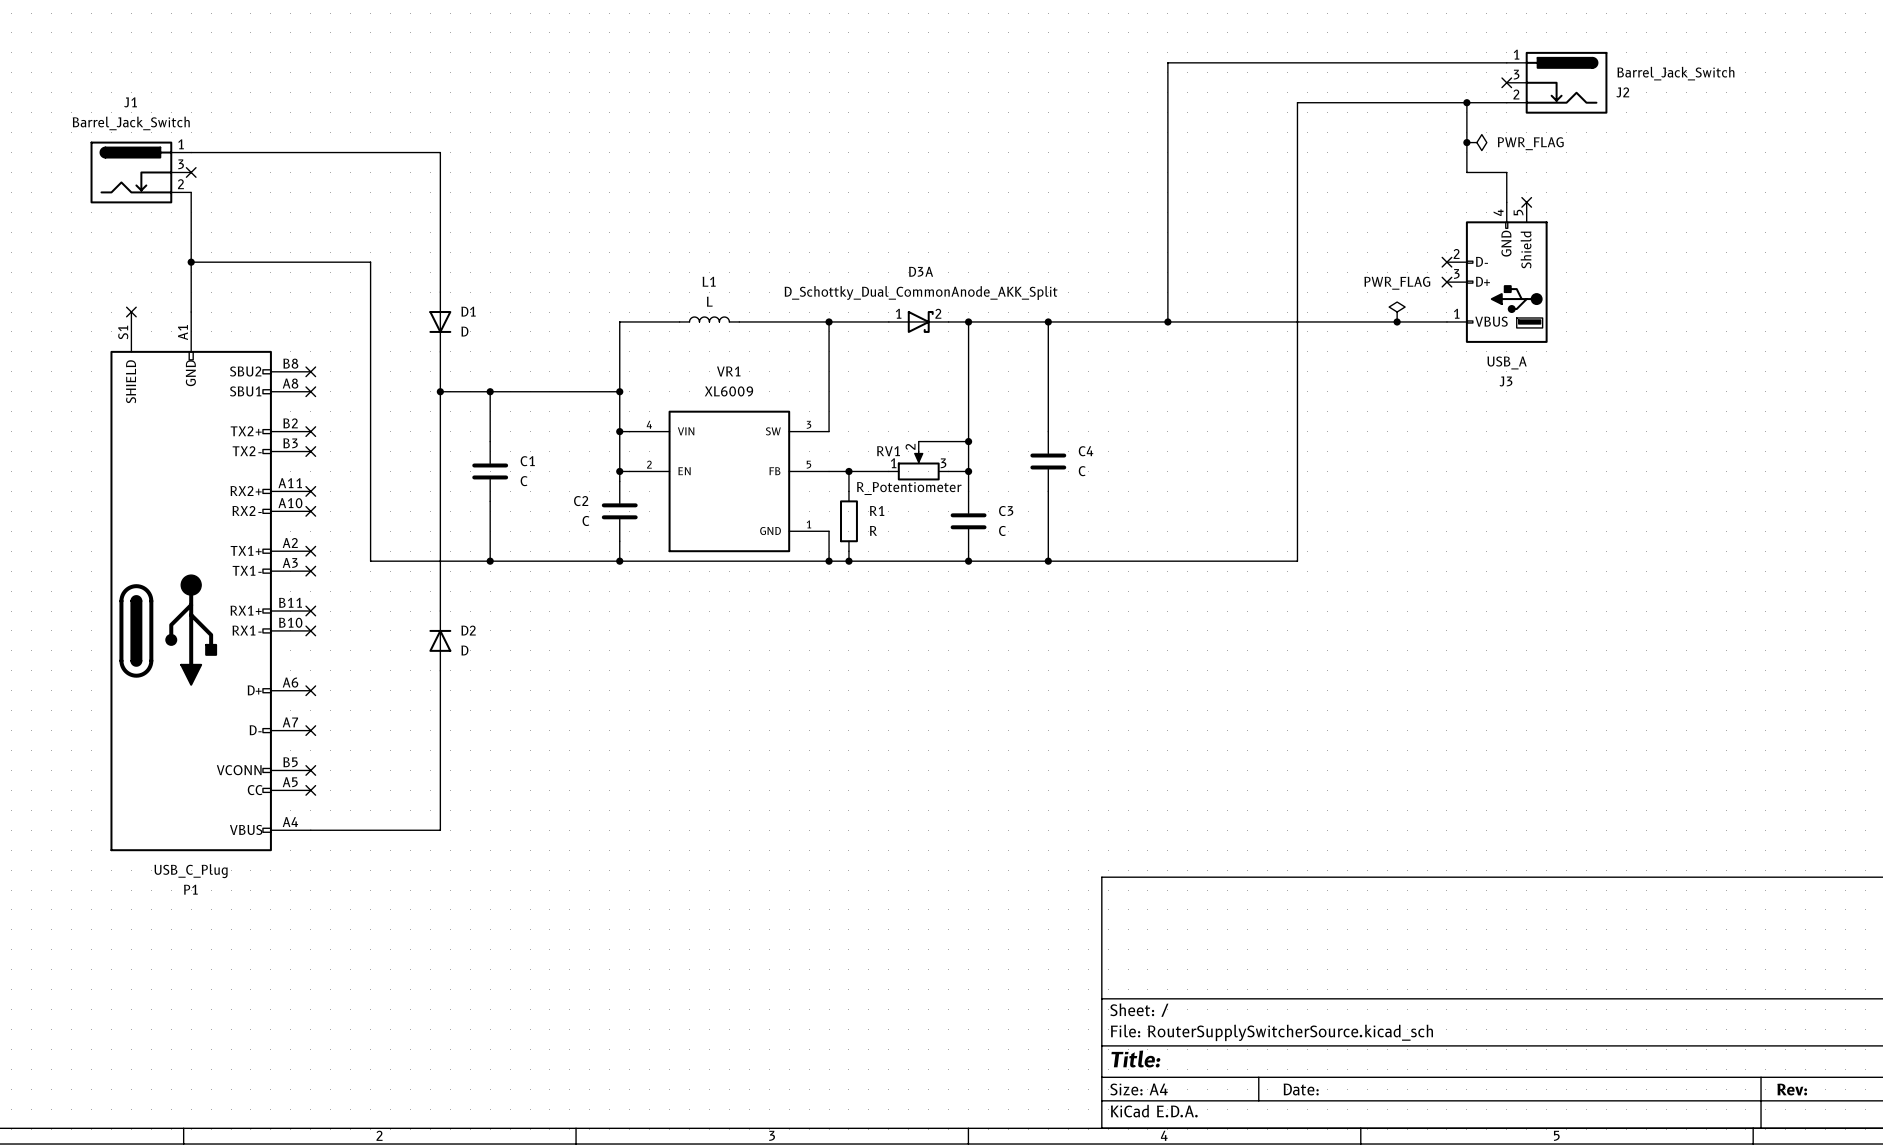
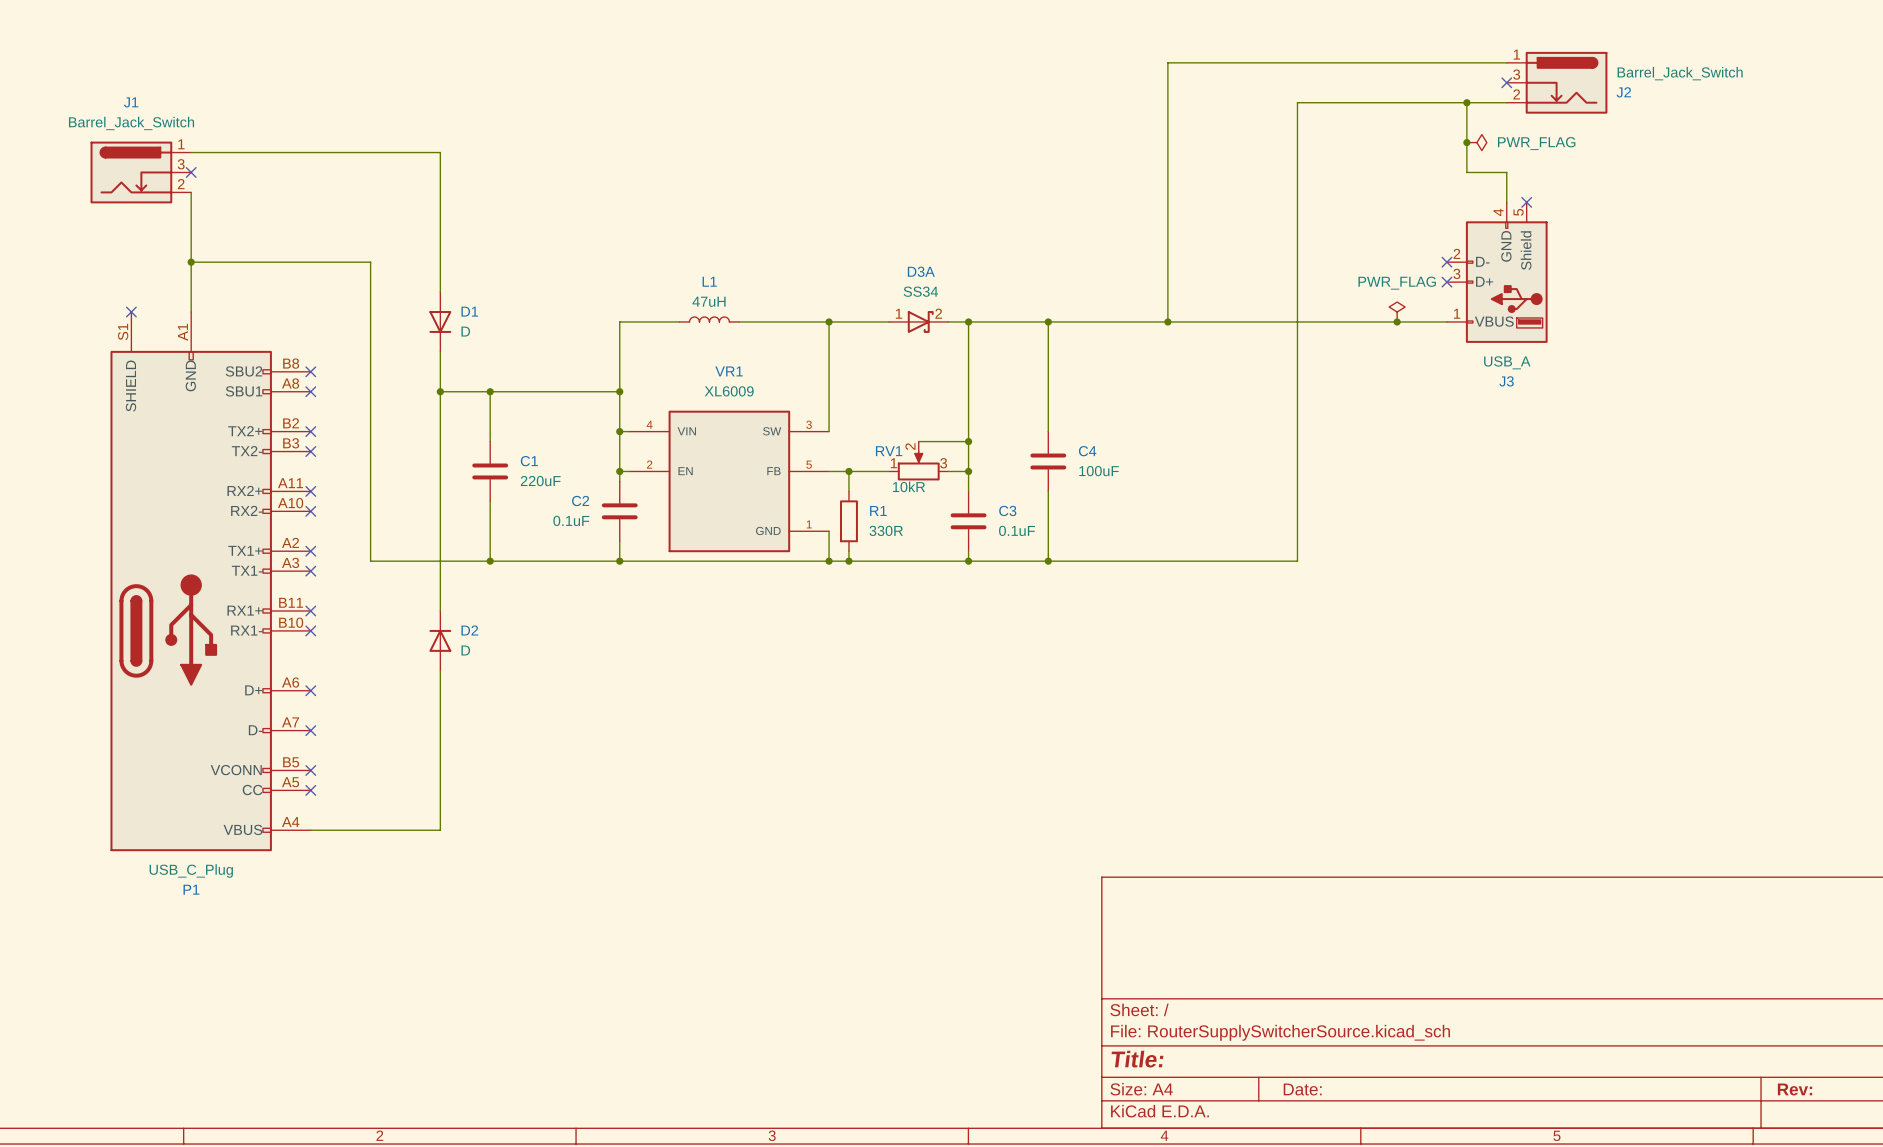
D3A value: D_Schottky_Dual_CommonAnode_AKK_Split (921, 293) -> SS34 (920, 291)
L1 value: L (709, 301) -> 47uH (709, 301)
C4 value: C (1082, 471) -> 100uF (1099, 471)
C1 value: C (524, 481) -> 220uF (540, 481)
RV1 value: R_Potentiometer (909, 488) -> 10kR (908, 486)
C2 value: C (585, 521) -> 0.1uF (571, 520)
R1 value: R (873, 530) -> 330R (886, 530)
C3 value: C (1002, 530) -> 0.1uF (1016, 530)

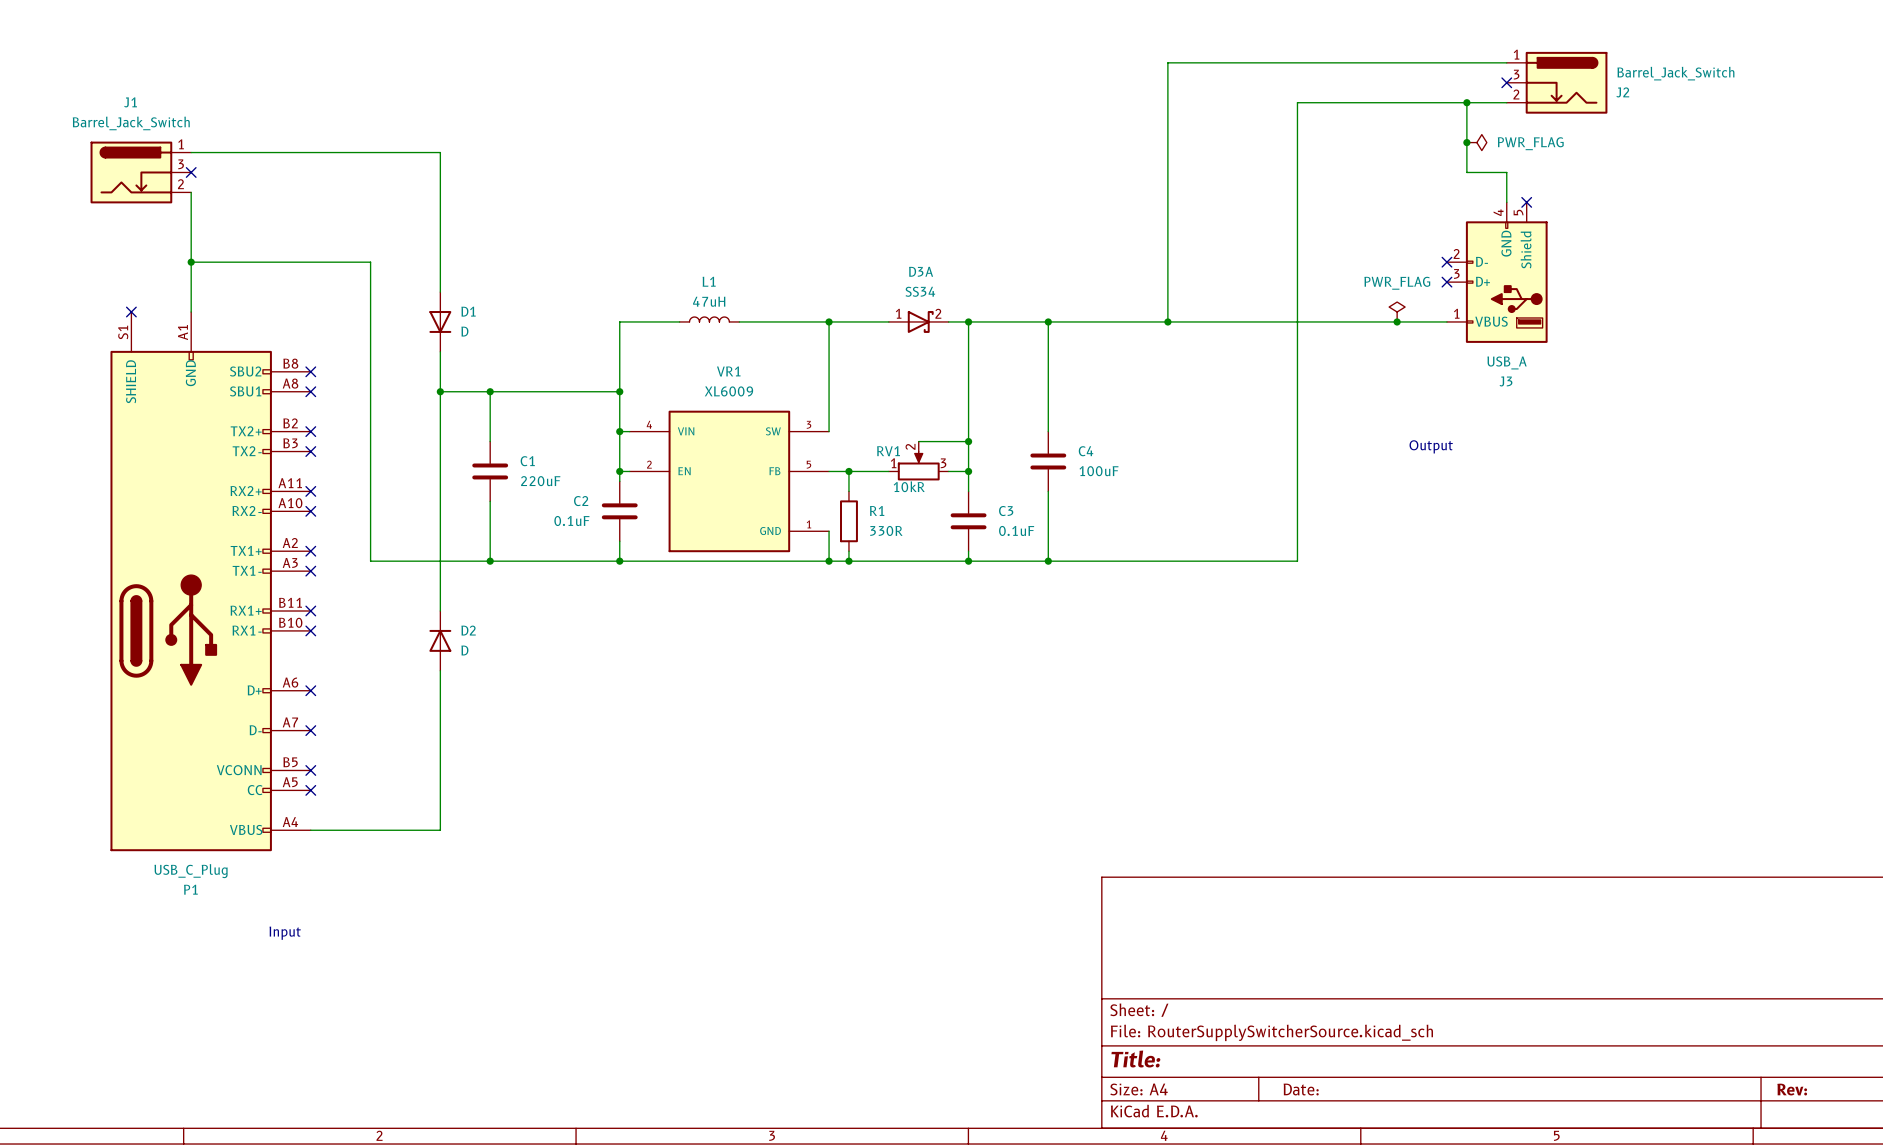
text: none -> Output (1431, 446)
text: none -> Input (285, 933)

